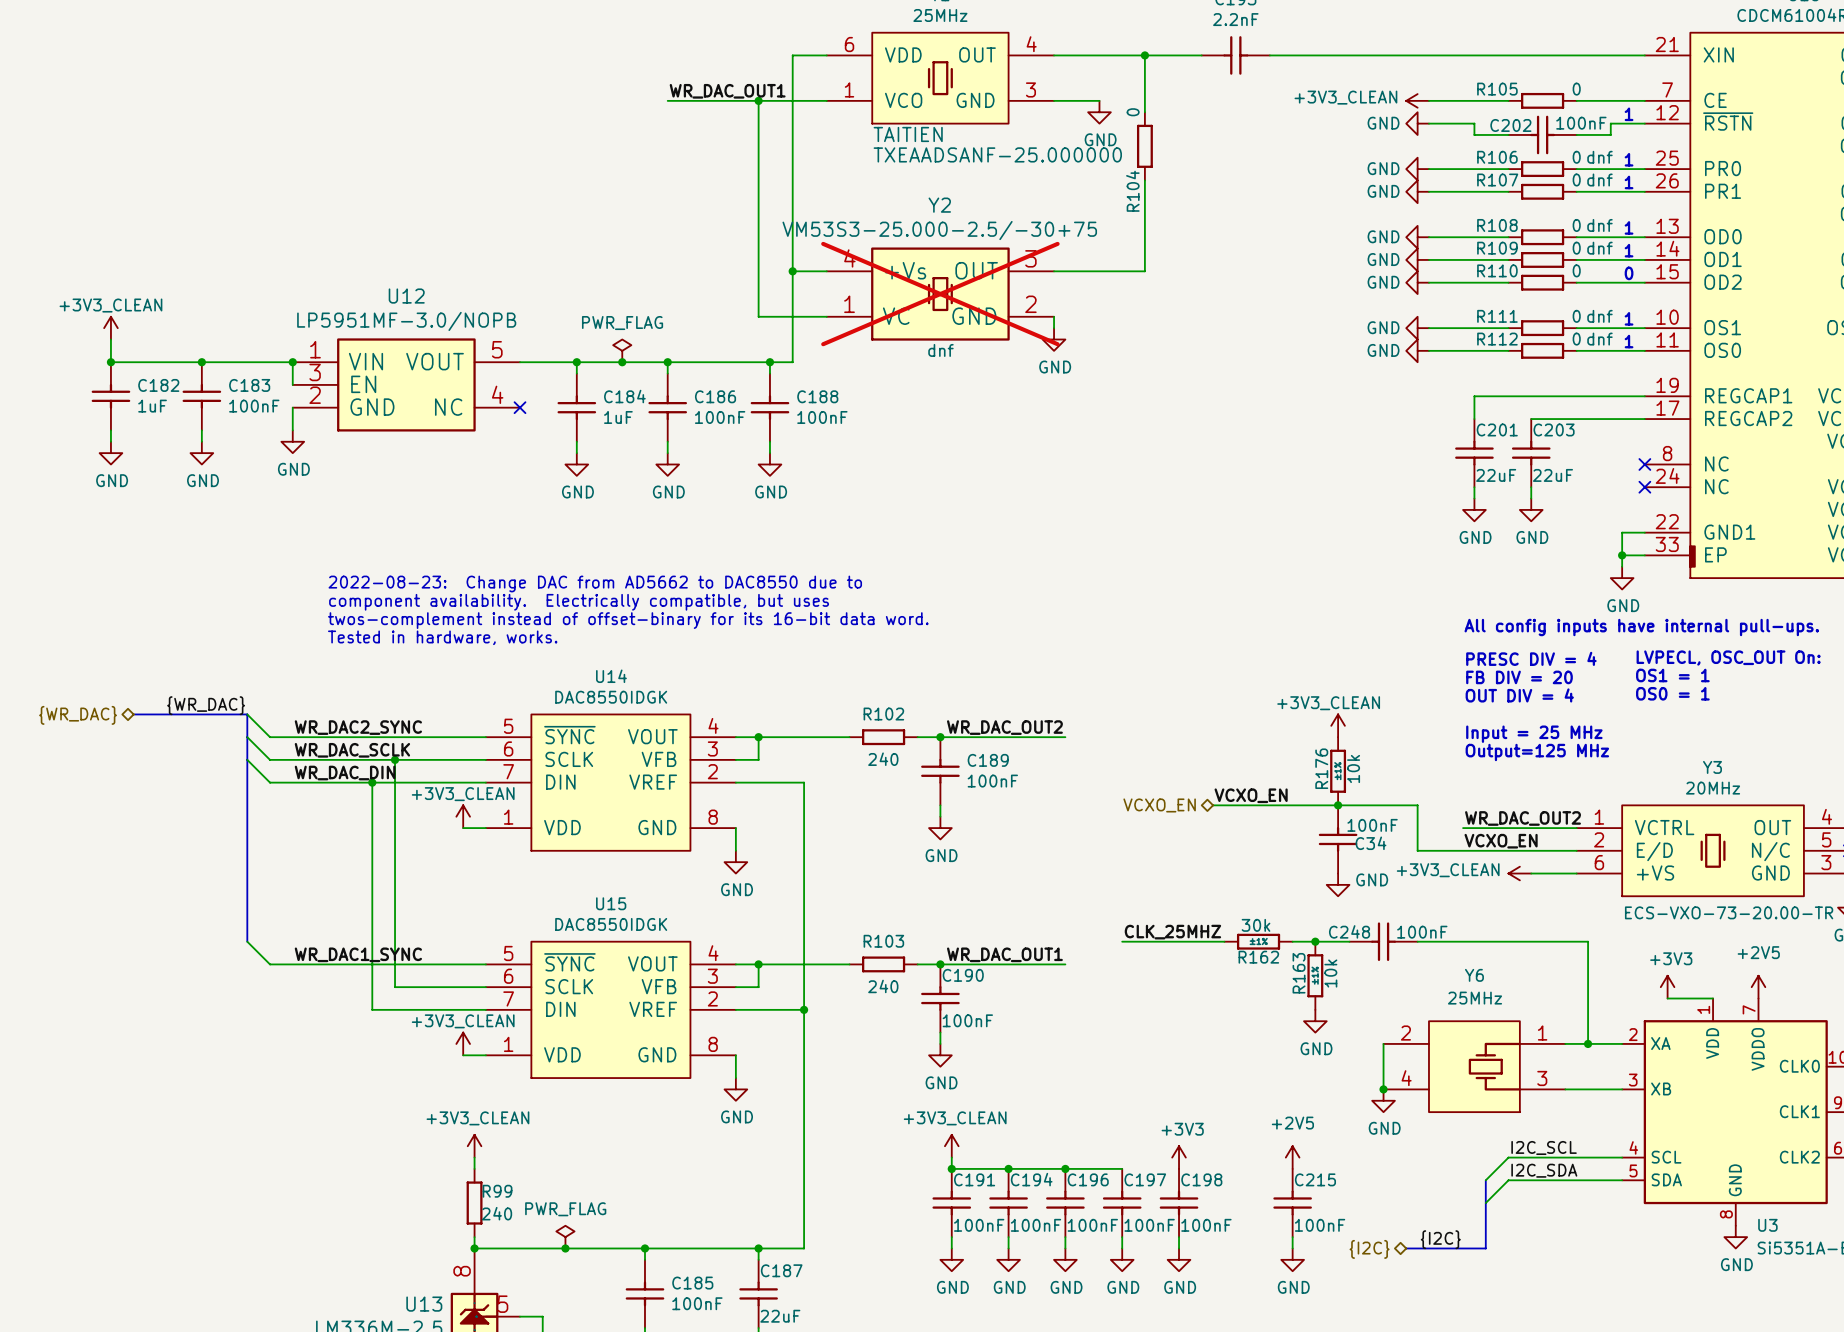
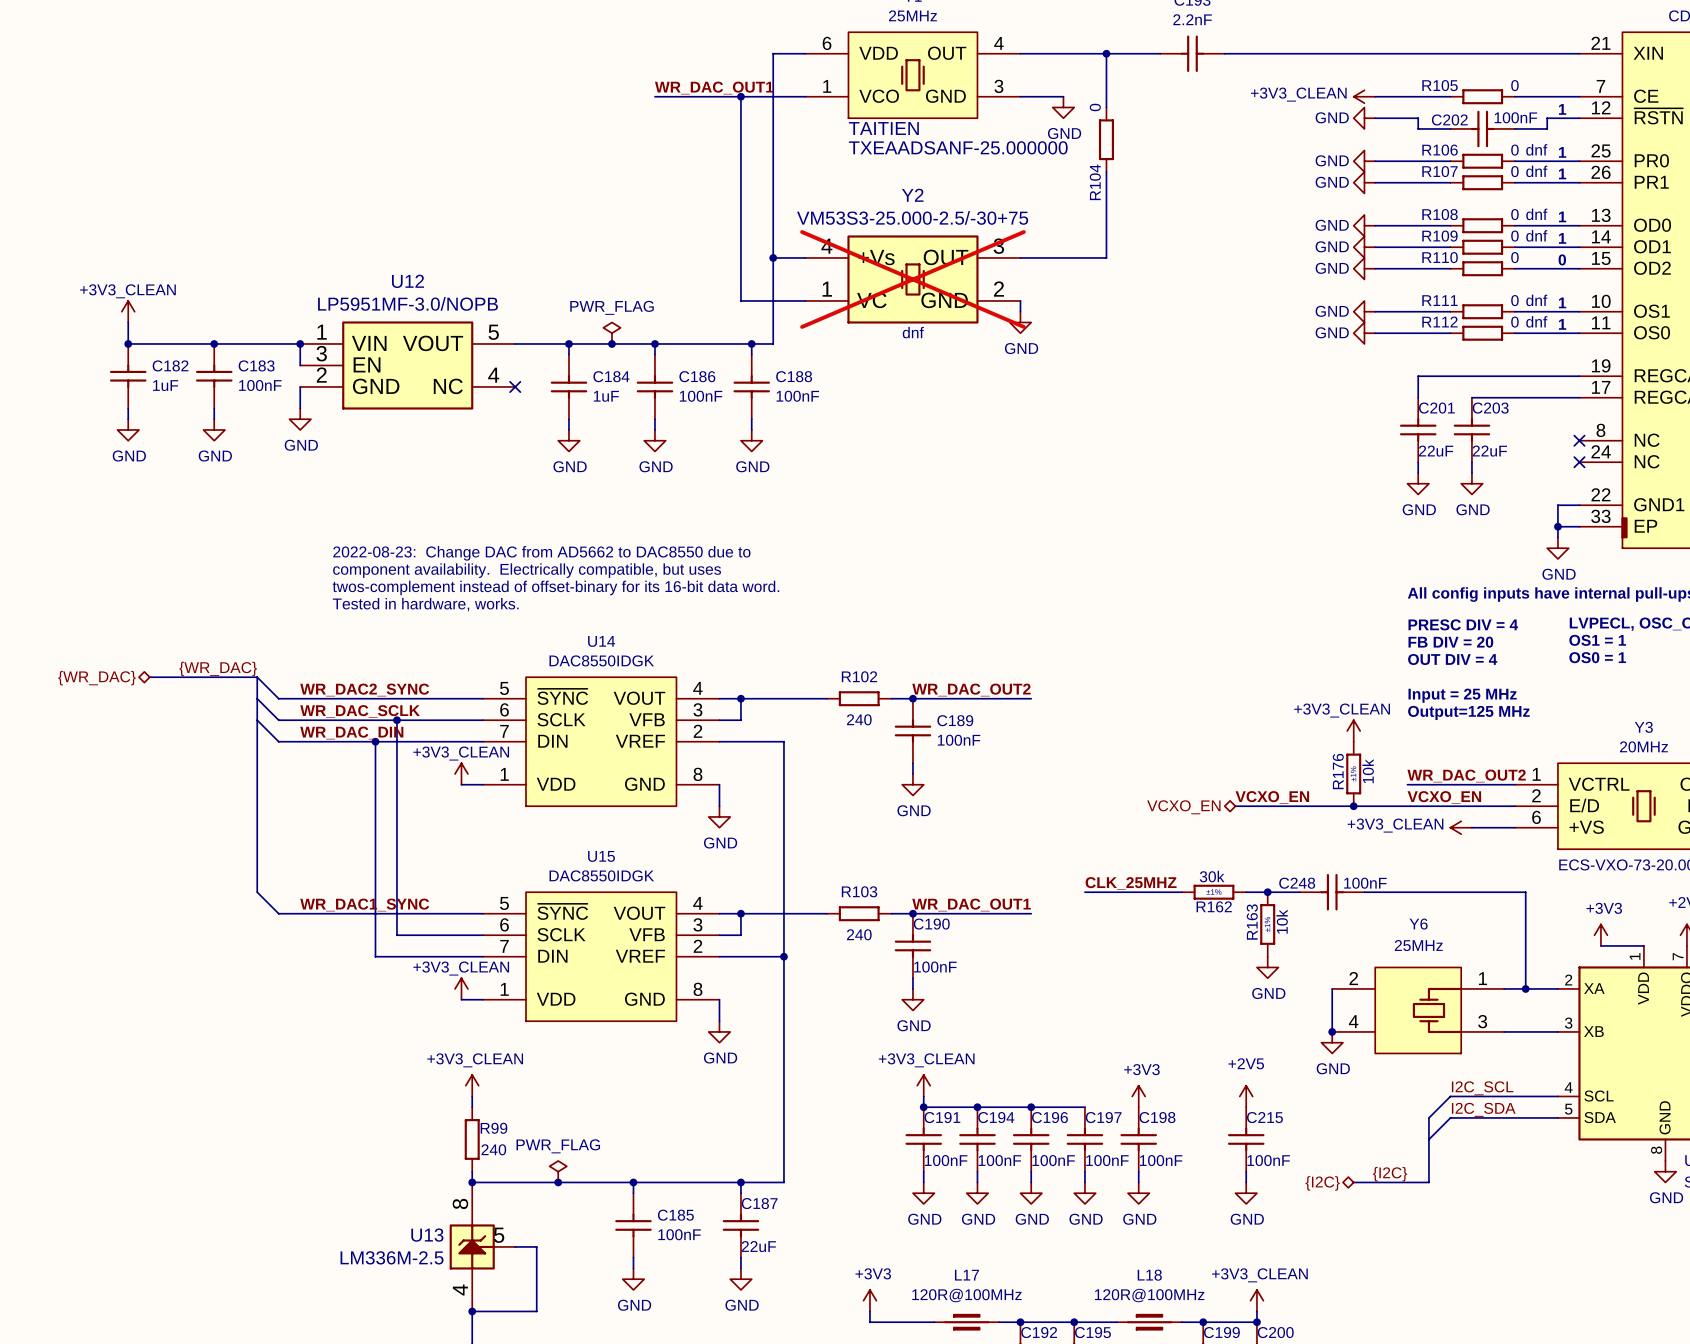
power symbol position: +3V3_CLEAN (1338, 725) -> +3V3_CLEAN (1353, 730)
R176 position: (1338, 771) -> (1353, 773)
label position: VCXO_EN (1251, 795) -> VCXO_EN (1272, 797)
hierarchical label position: VCXO_EN (1159, 805) -> VCXO_EN (1183, 807)
wire: (1213, 805) (1417, 805) (1417, 850) -> (1235, 806) (1364, 806)
junction: (1338, 805) -> none
C34: (1338, 839) -> none
junction: none -> (1353, 806)
power symbol: GND (1338, 884) -> none

